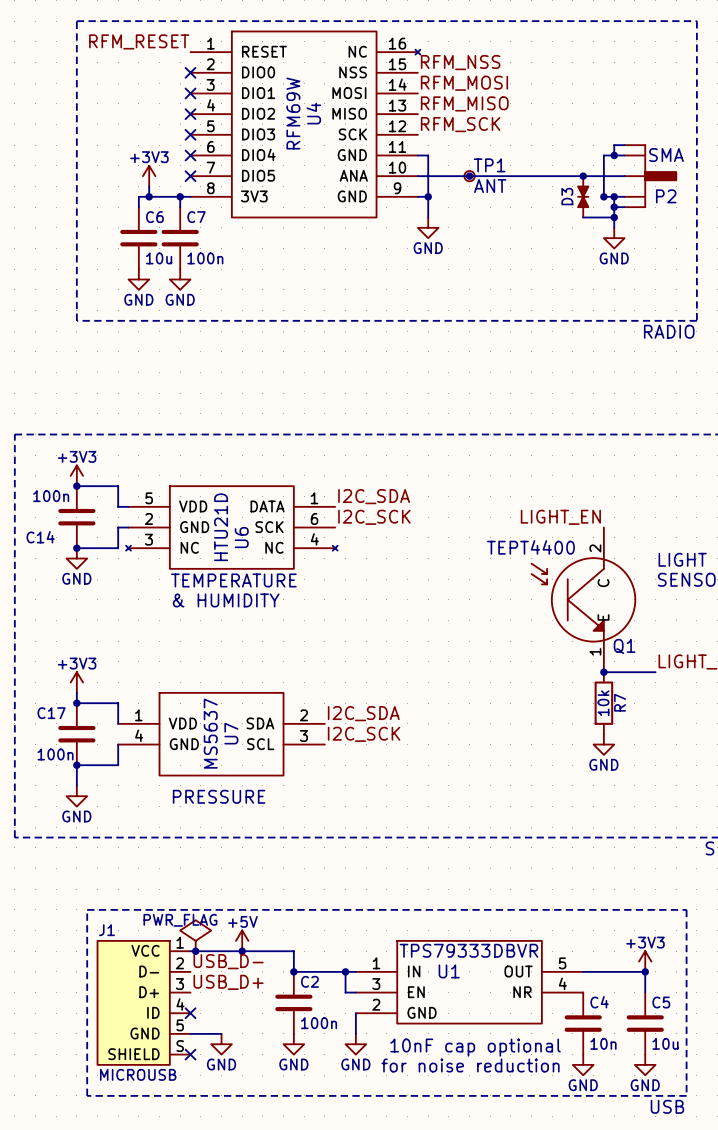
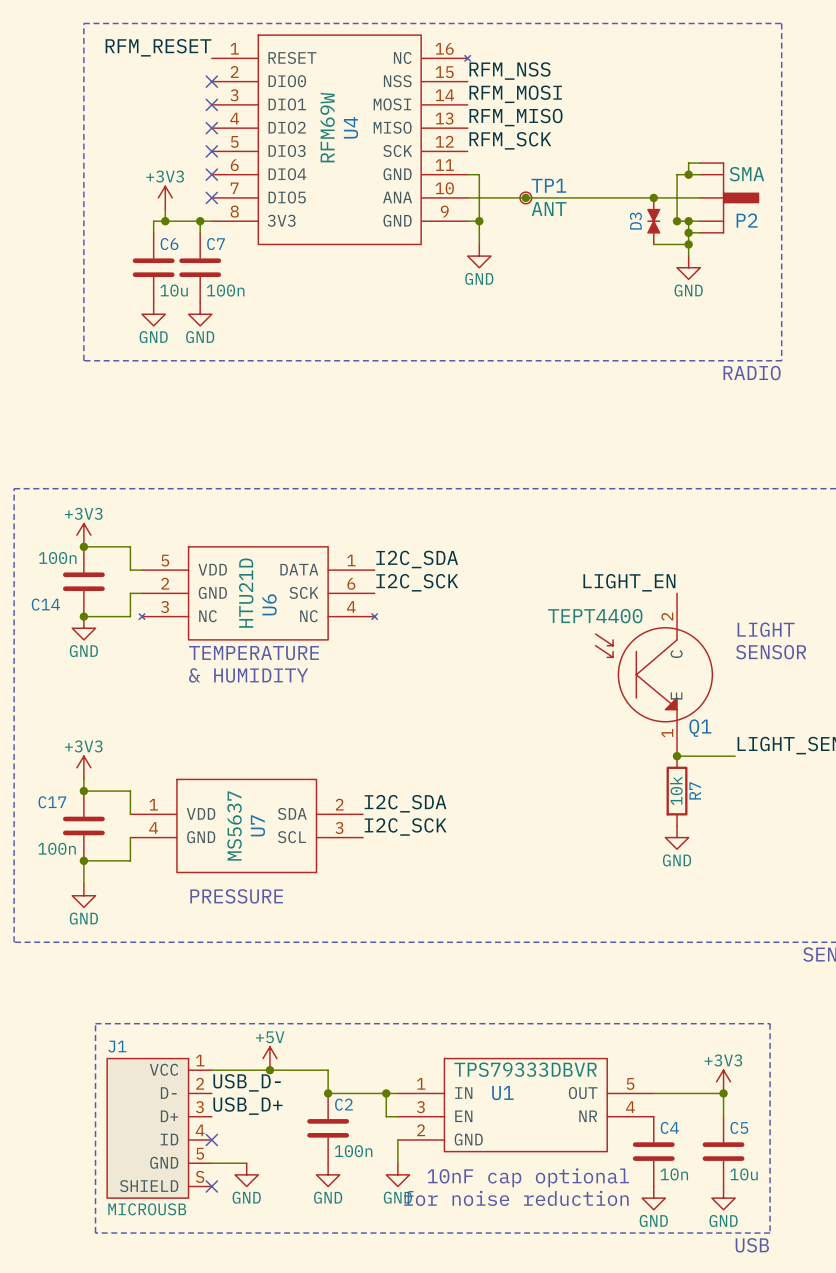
power symbol: PWR_FLAG (195, 935) -> none
junction: (195, 951) -> none

